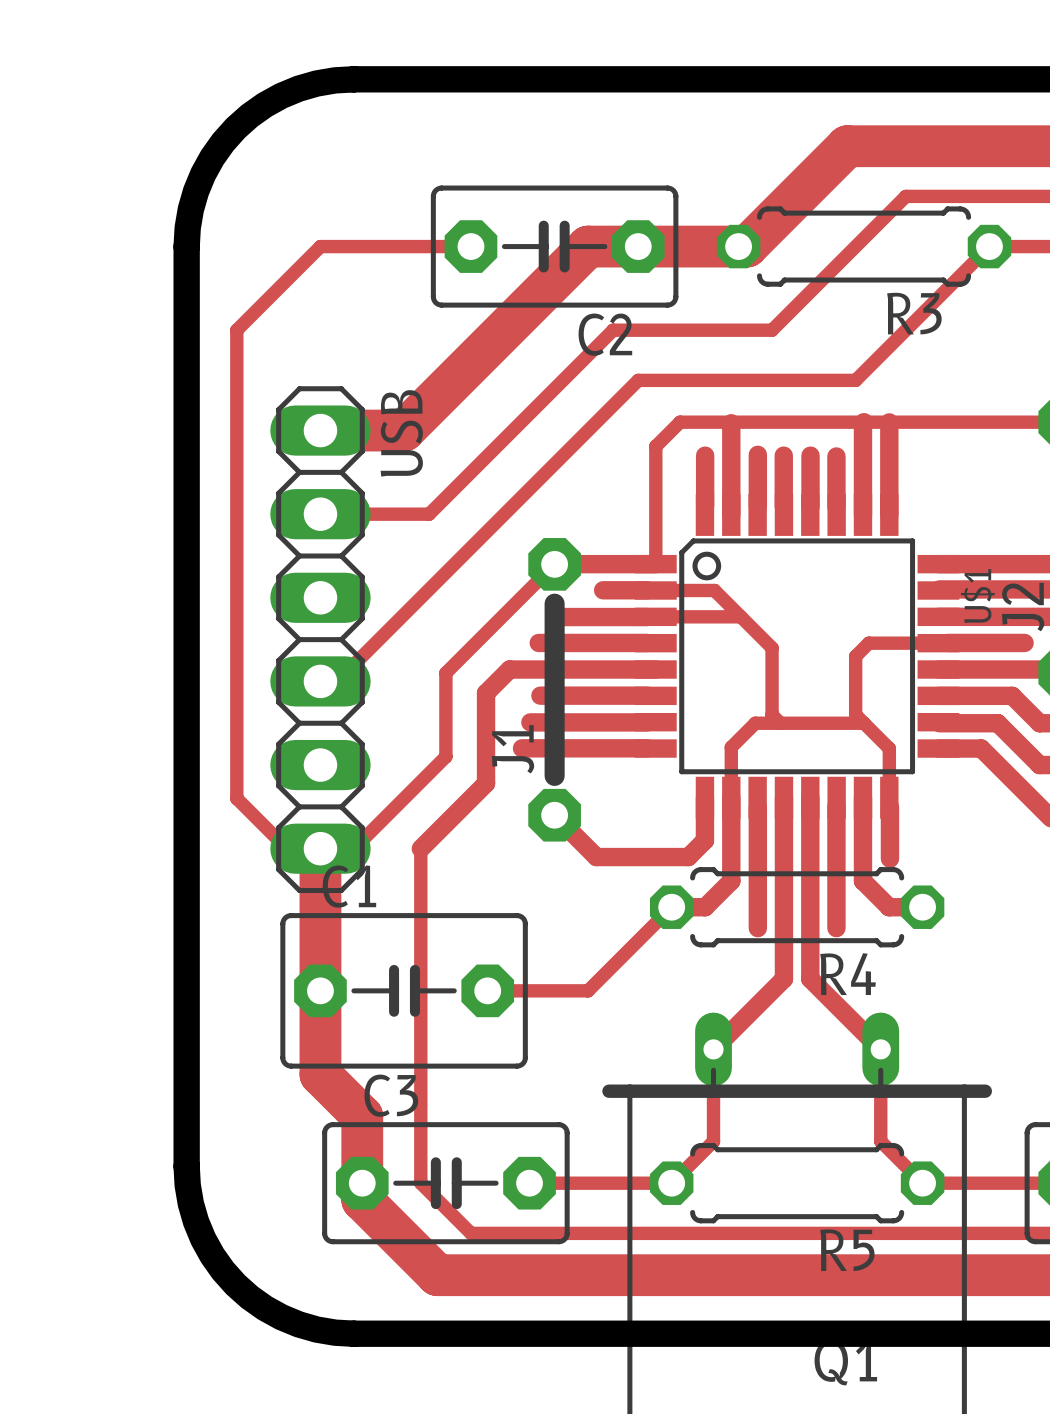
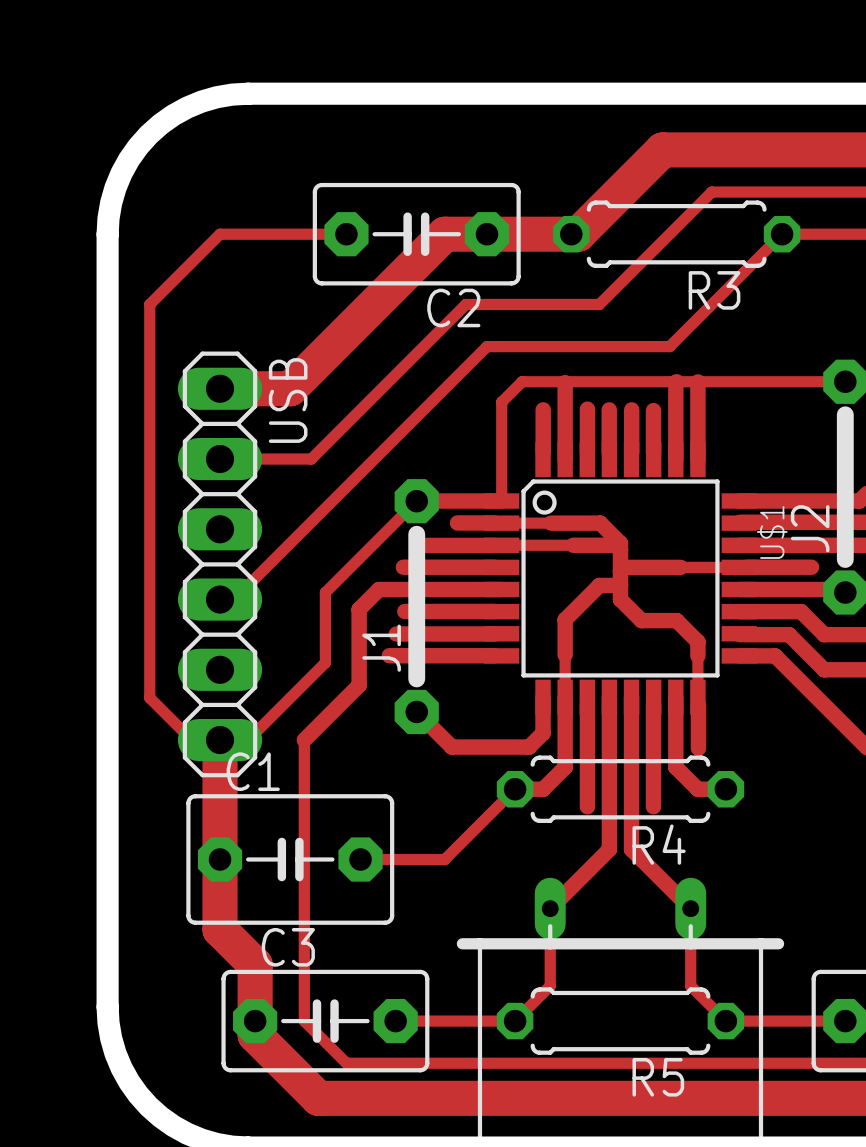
track: (714, 590) (772, 647) (772, 714) (780, 723) -> (551, 523) (600, 523) (620, 543) (620, 599) (641, 620) (676, 620) (697, 641) (697, 655)
track: none -> (573, 545) (615, 545) (620, 550)
track: (868, 643) (855, 656) (855, 714) (889, 748) -> (680, 567) (624, 567) (620, 571)
track: (864, 723) (755, 723) (731, 747) -> (620, 585) (599, 585) (565, 619) (565, 654)

